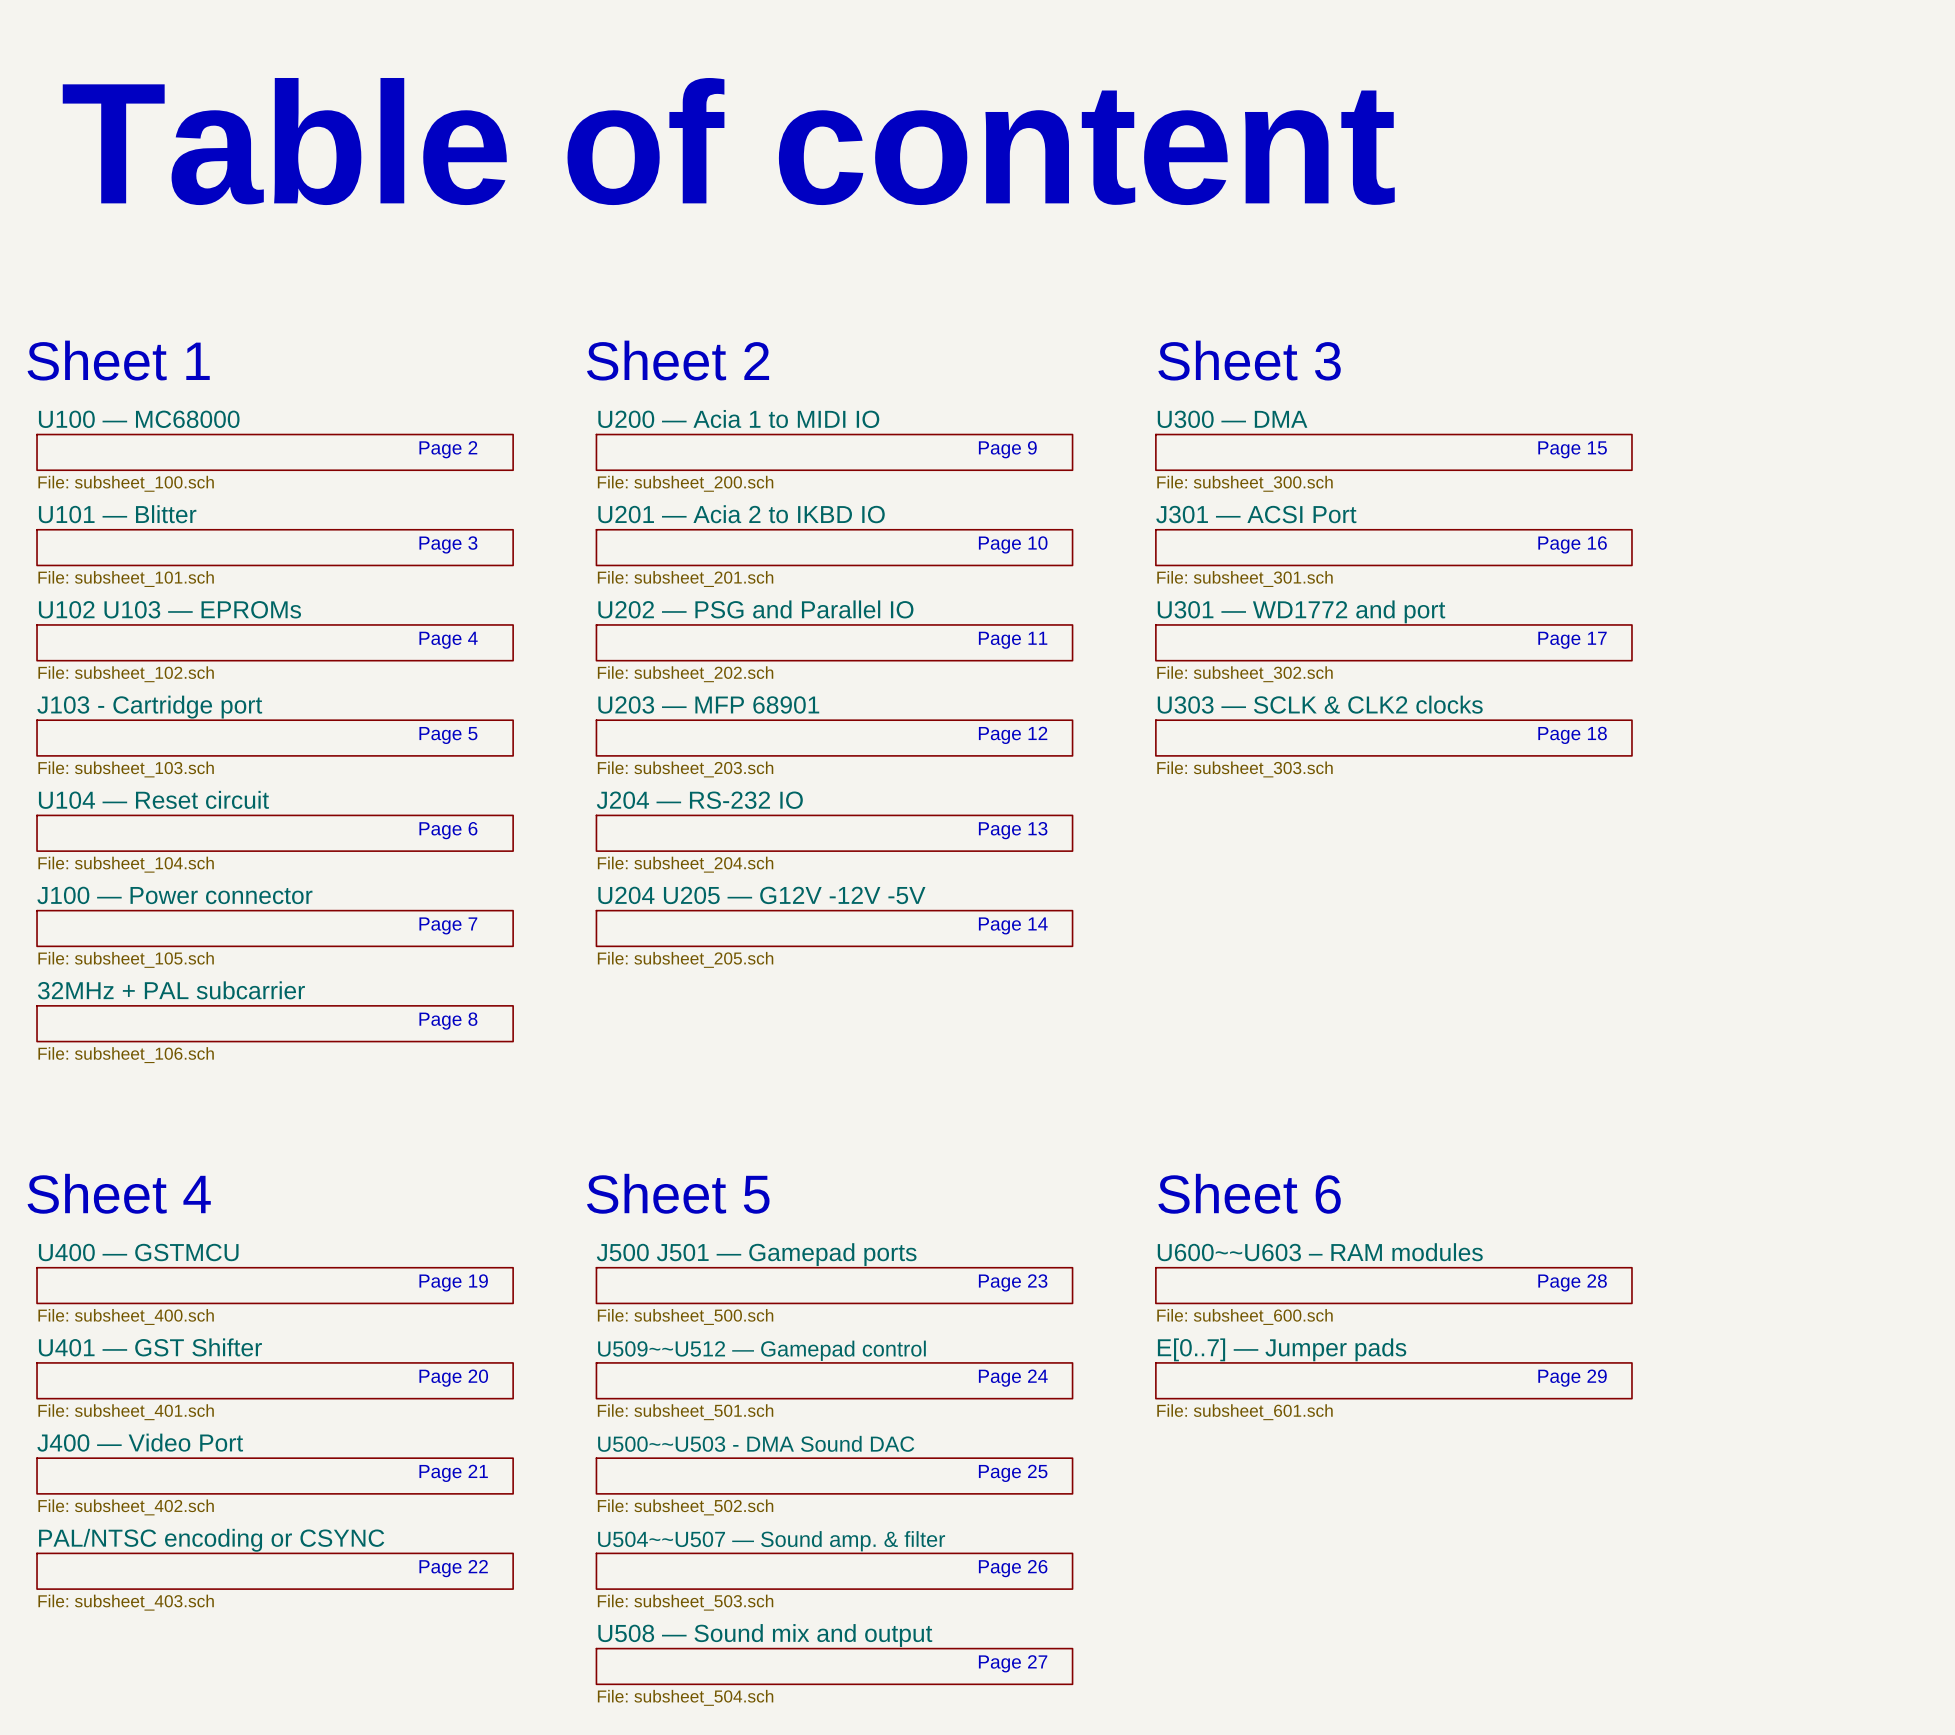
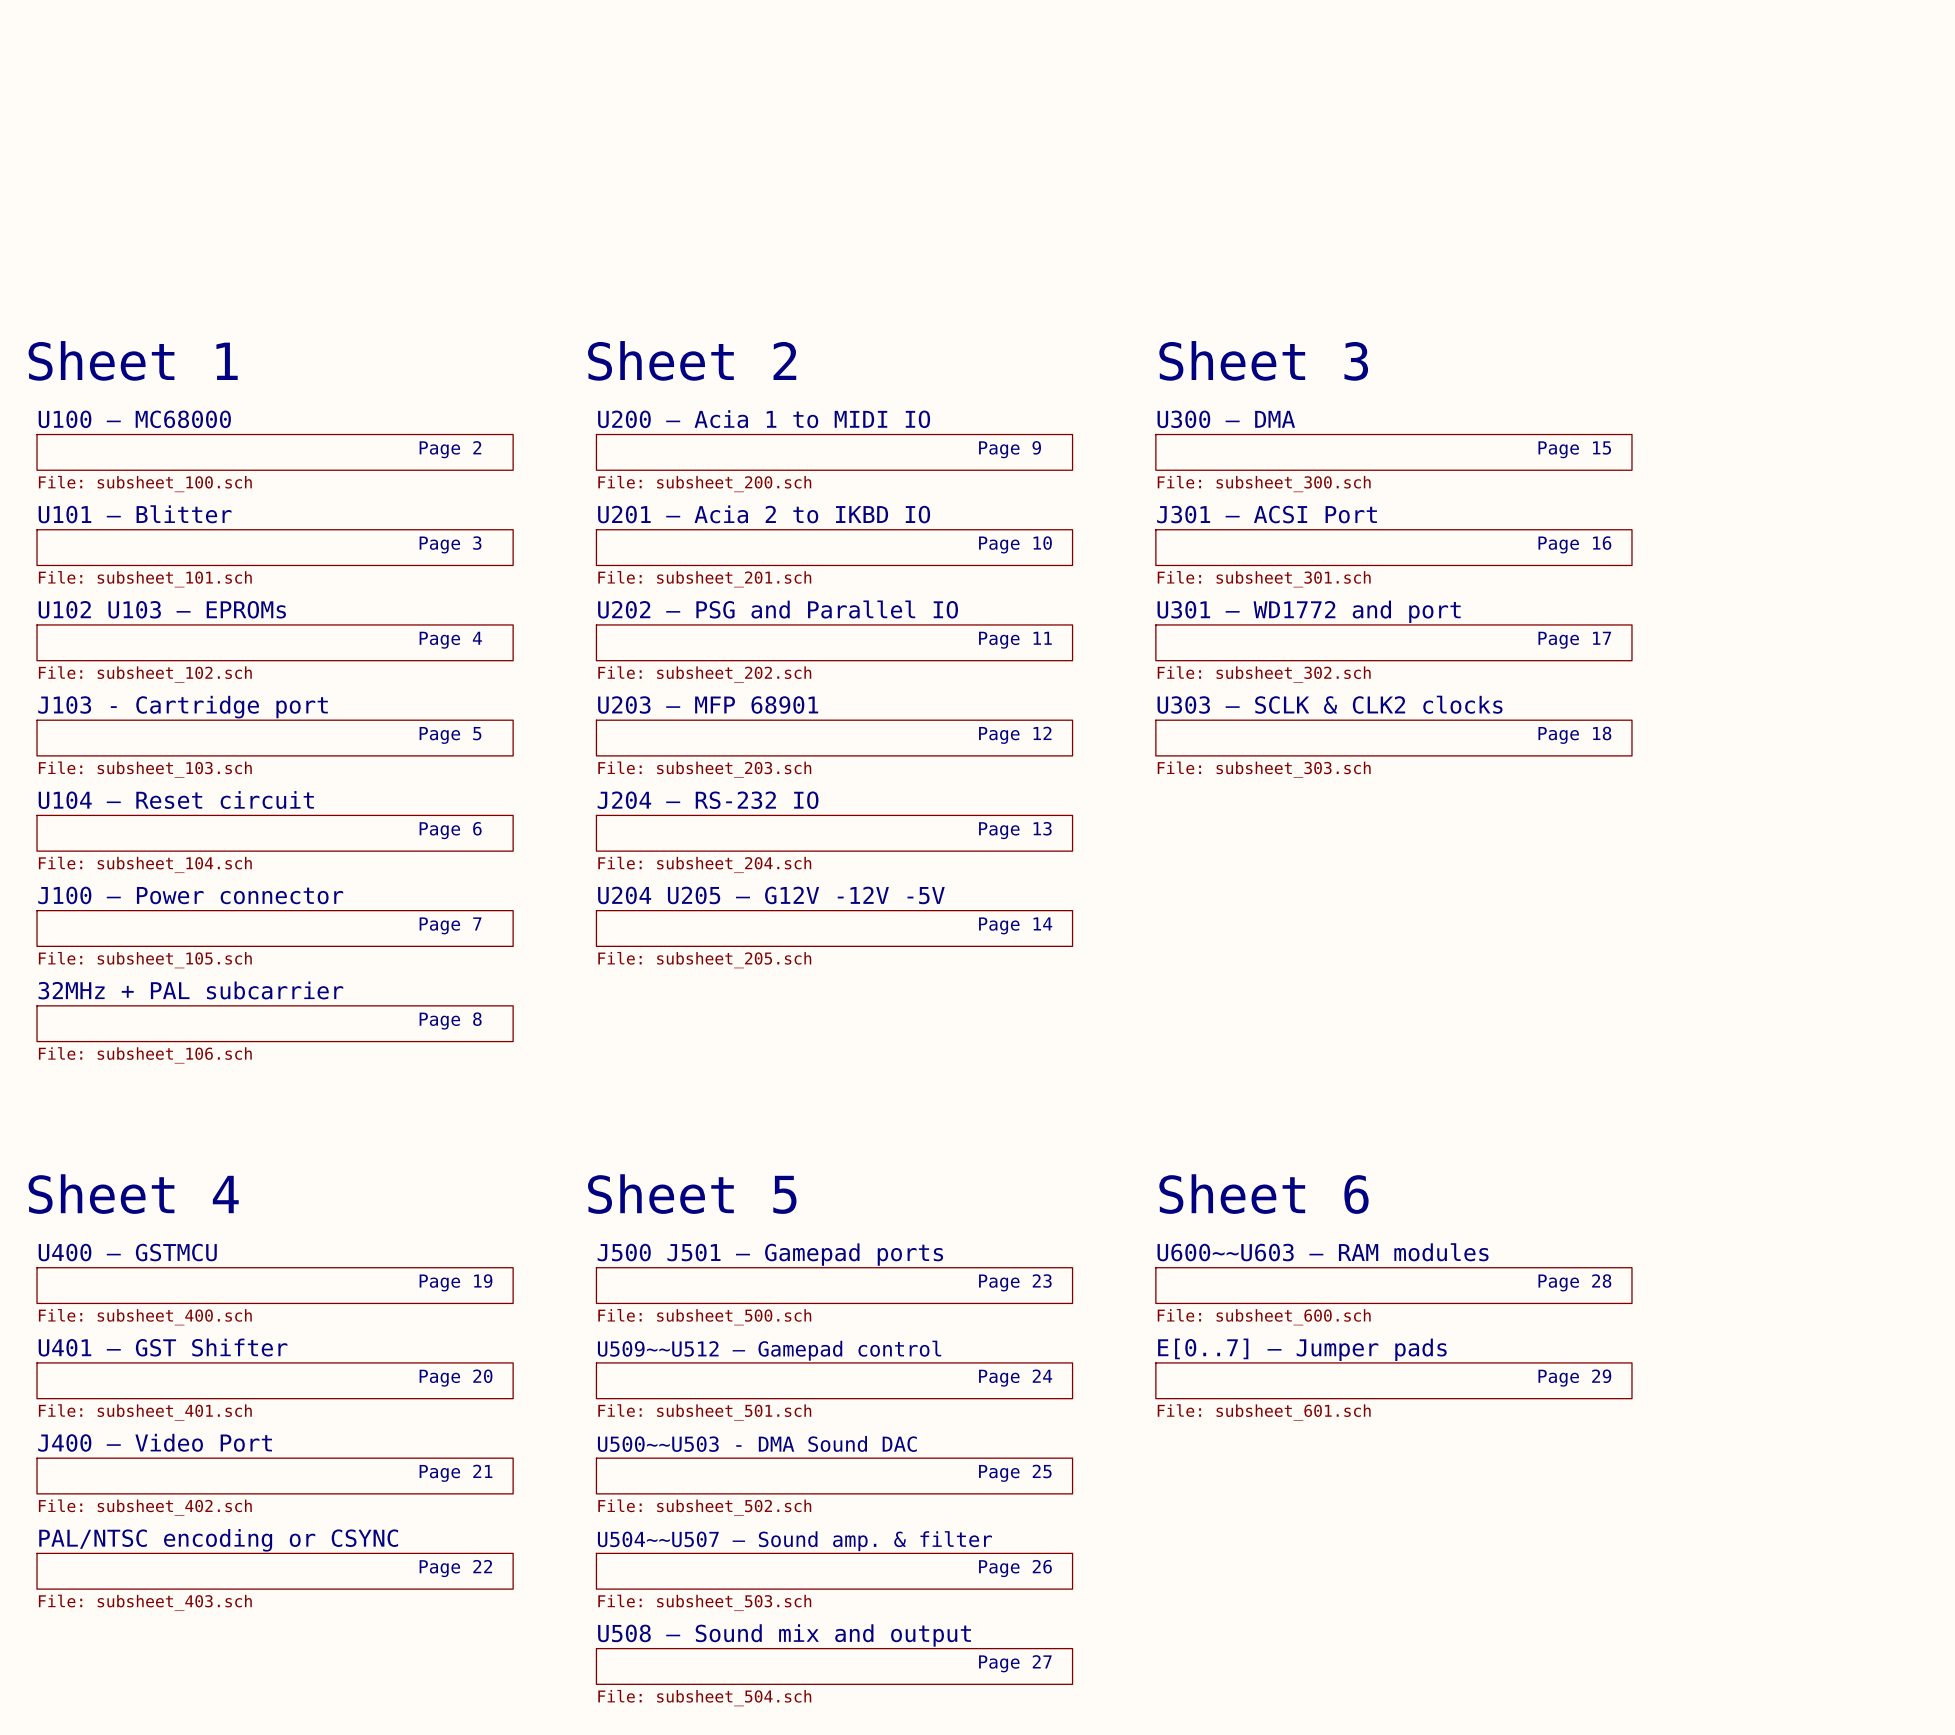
text: Table of content (728, 141) -> none

